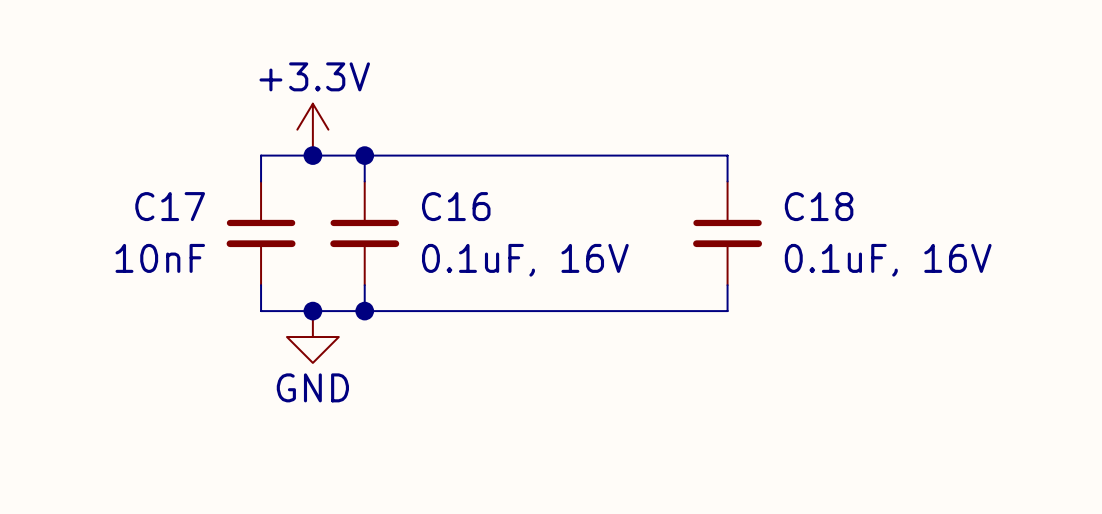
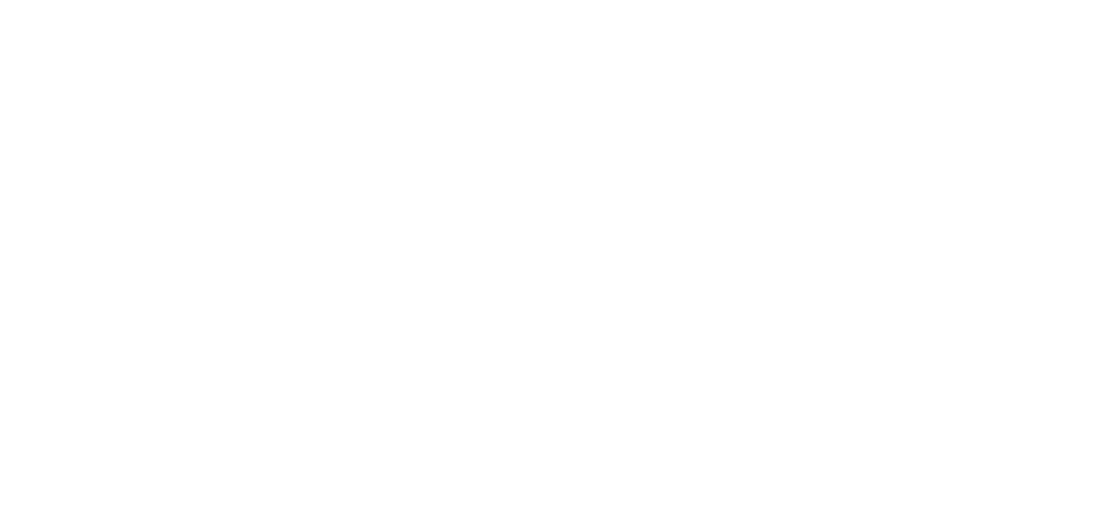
power symbol: +3.3V (312, 129) -> none
junction: (312, 155) -> none
wire: (364, 155) (364, 181) -> none
junction: (364, 155) -> none
wire: (261, 181) (261, 155) (727, 155) (727, 181) -> none
C17: 10nF (261, 233) -> none
C16: 0.1uF, 16V (364, 233) -> none
C18: 0.1uF, 16V (727, 233) -> none
wire: (261, 285) (261, 311) (727, 311) (727, 285) -> none
wire: (364, 285) (364, 311) -> none
junction: (312, 311) -> none
junction: (364, 311) -> none
power symbol: GND (312, 337) -> none

